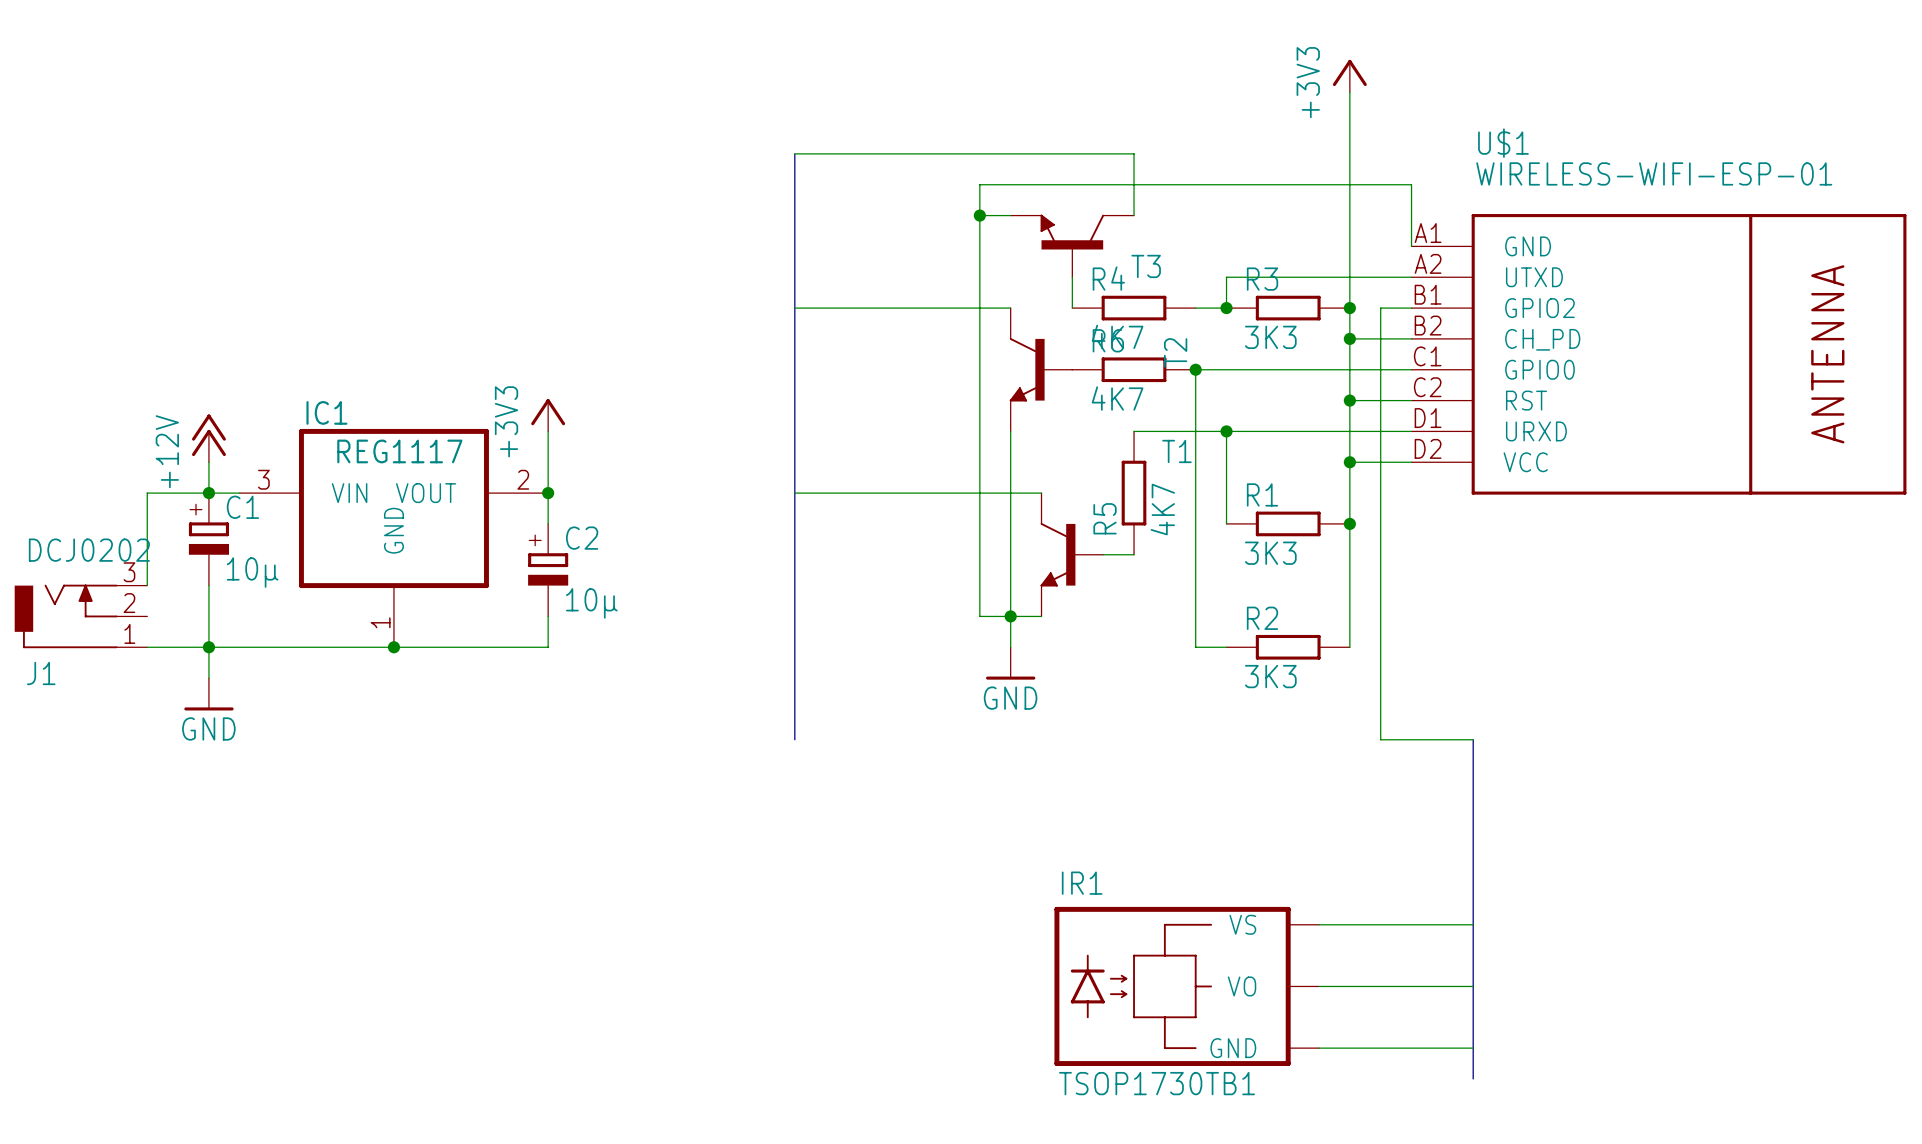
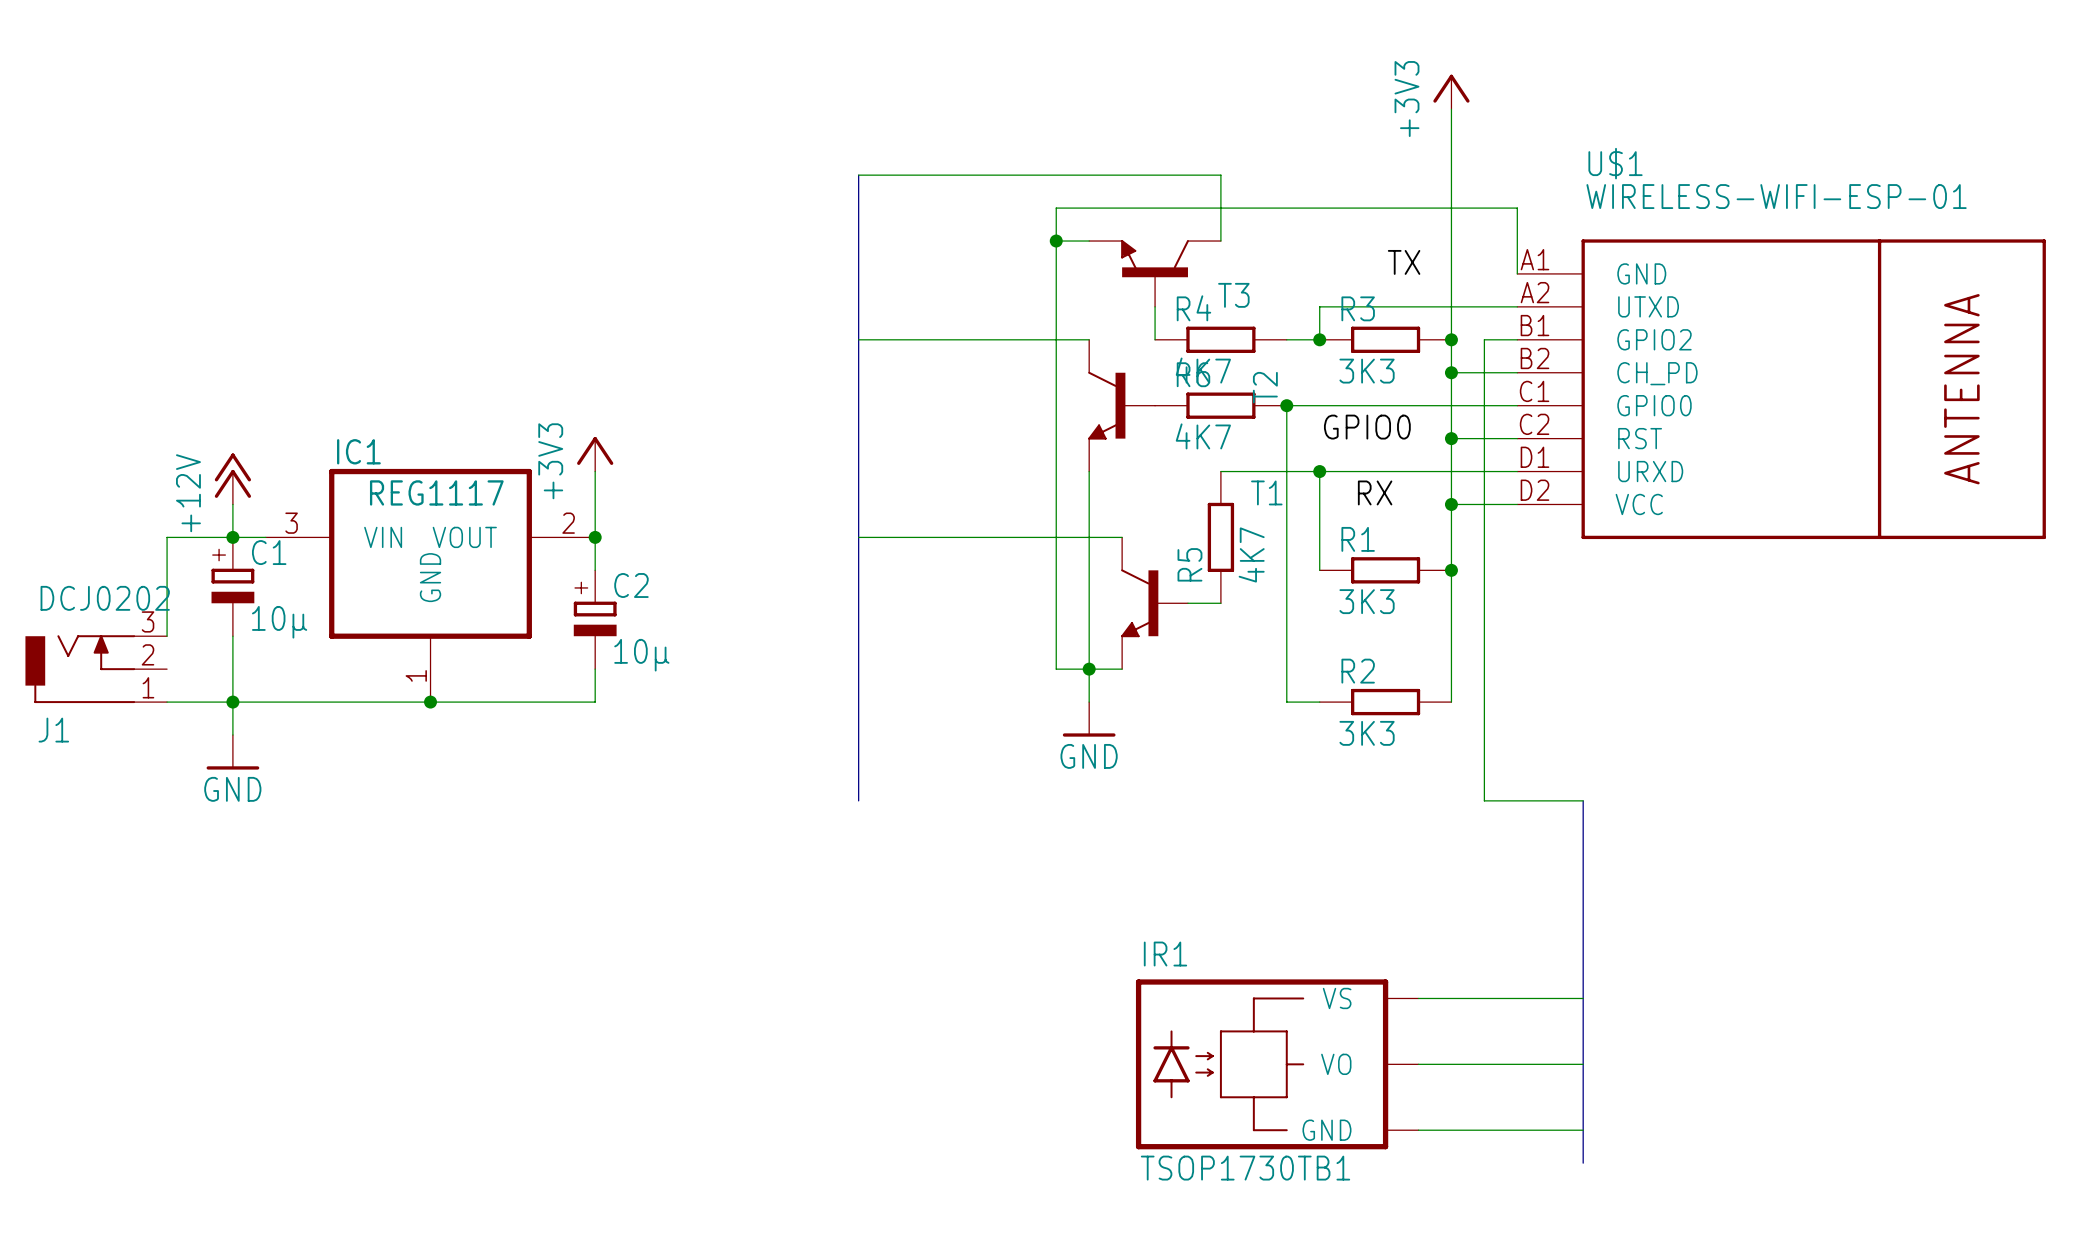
label: none -> TX (1404, 262)
label: none -> GPIO0 (1367, 427)
label: none -> RX (1375, 492)

